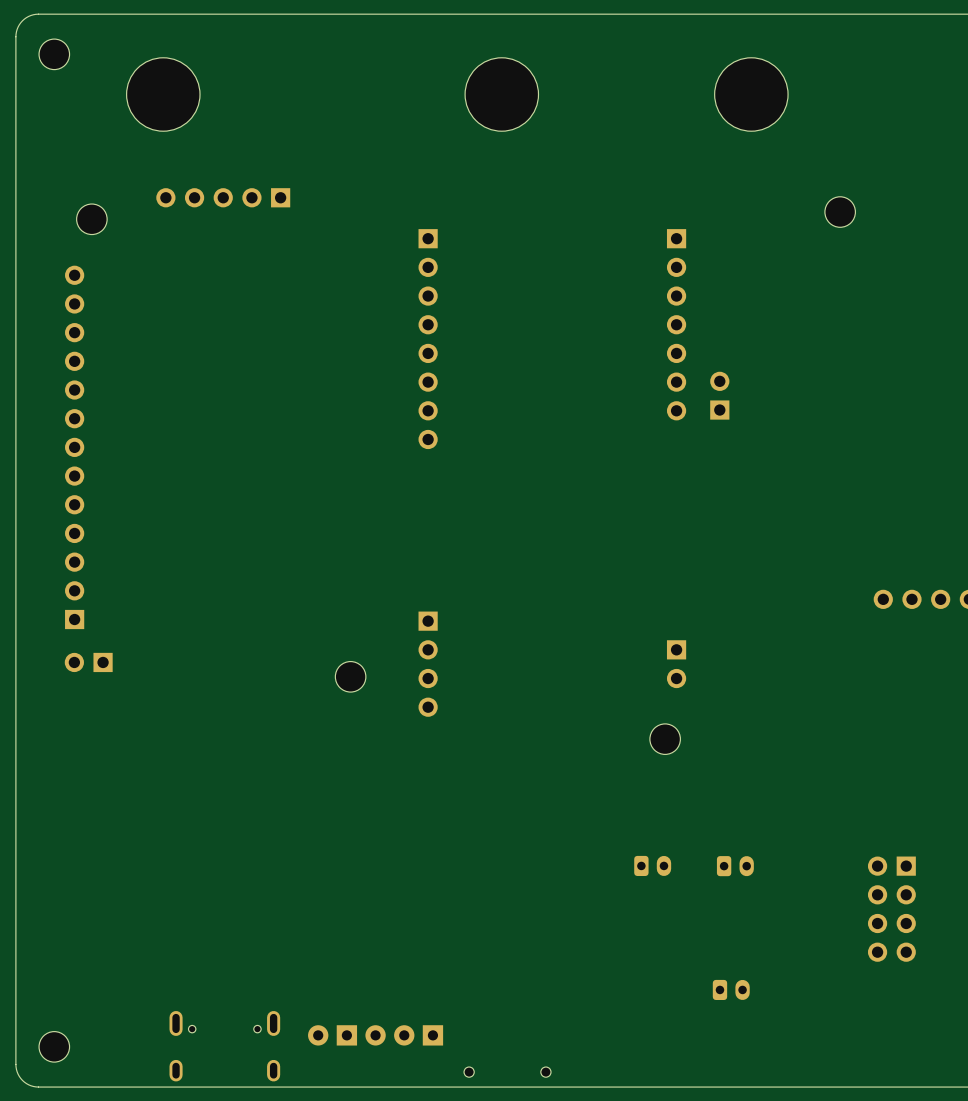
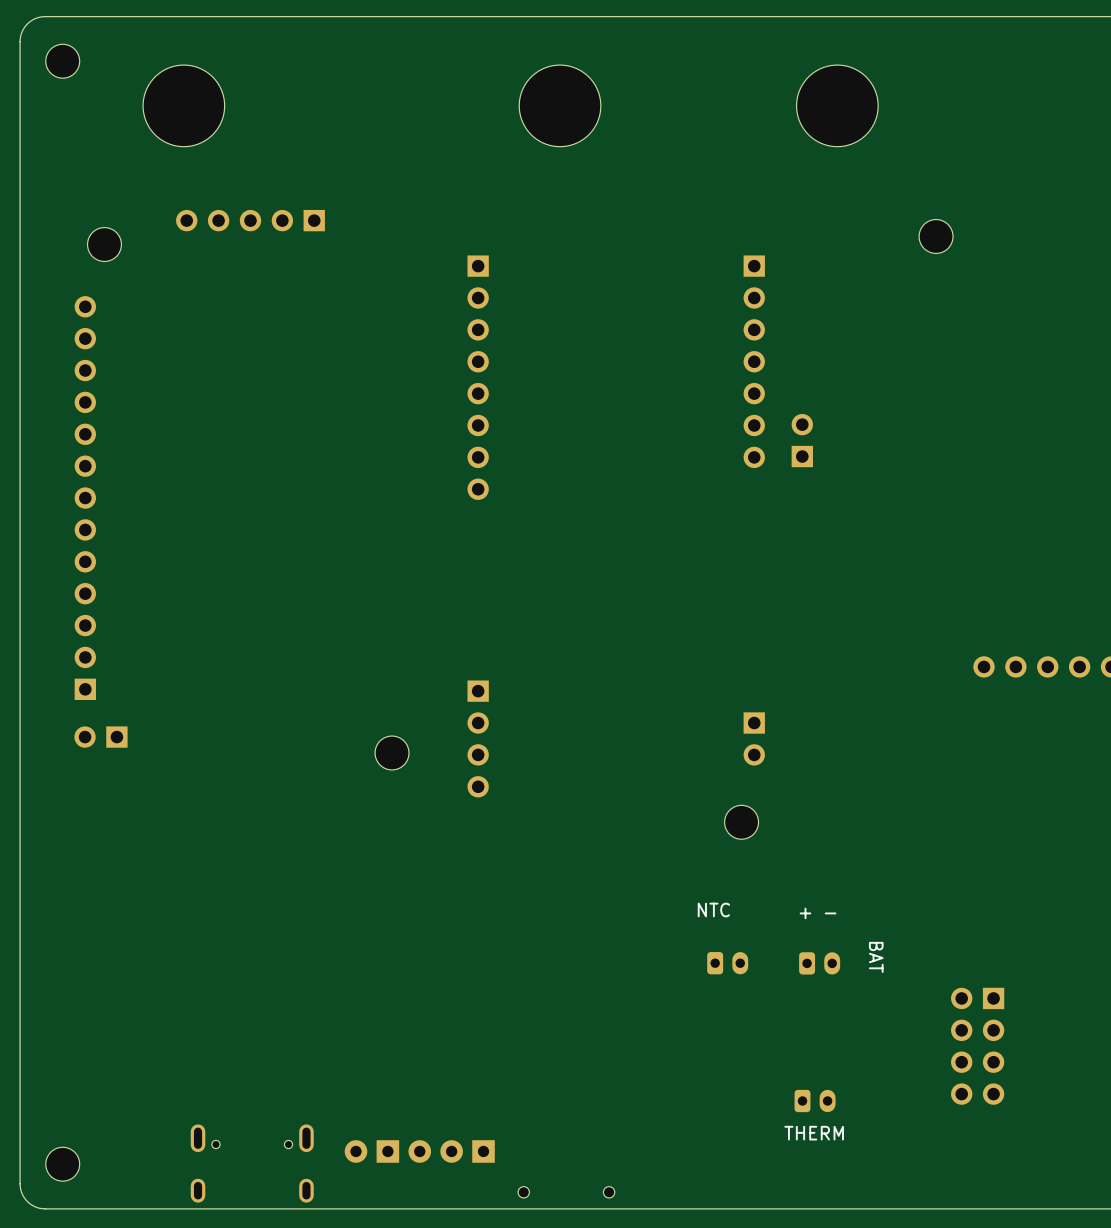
text: none -> NTC (713, 910)
text: none -> + (805, 913)
text: none -> - (830, 913)
text: none -> BAT (876, 957)
part position: (891, 909) -> (977, 1046)
text: none -> THERM (814, 1133)

